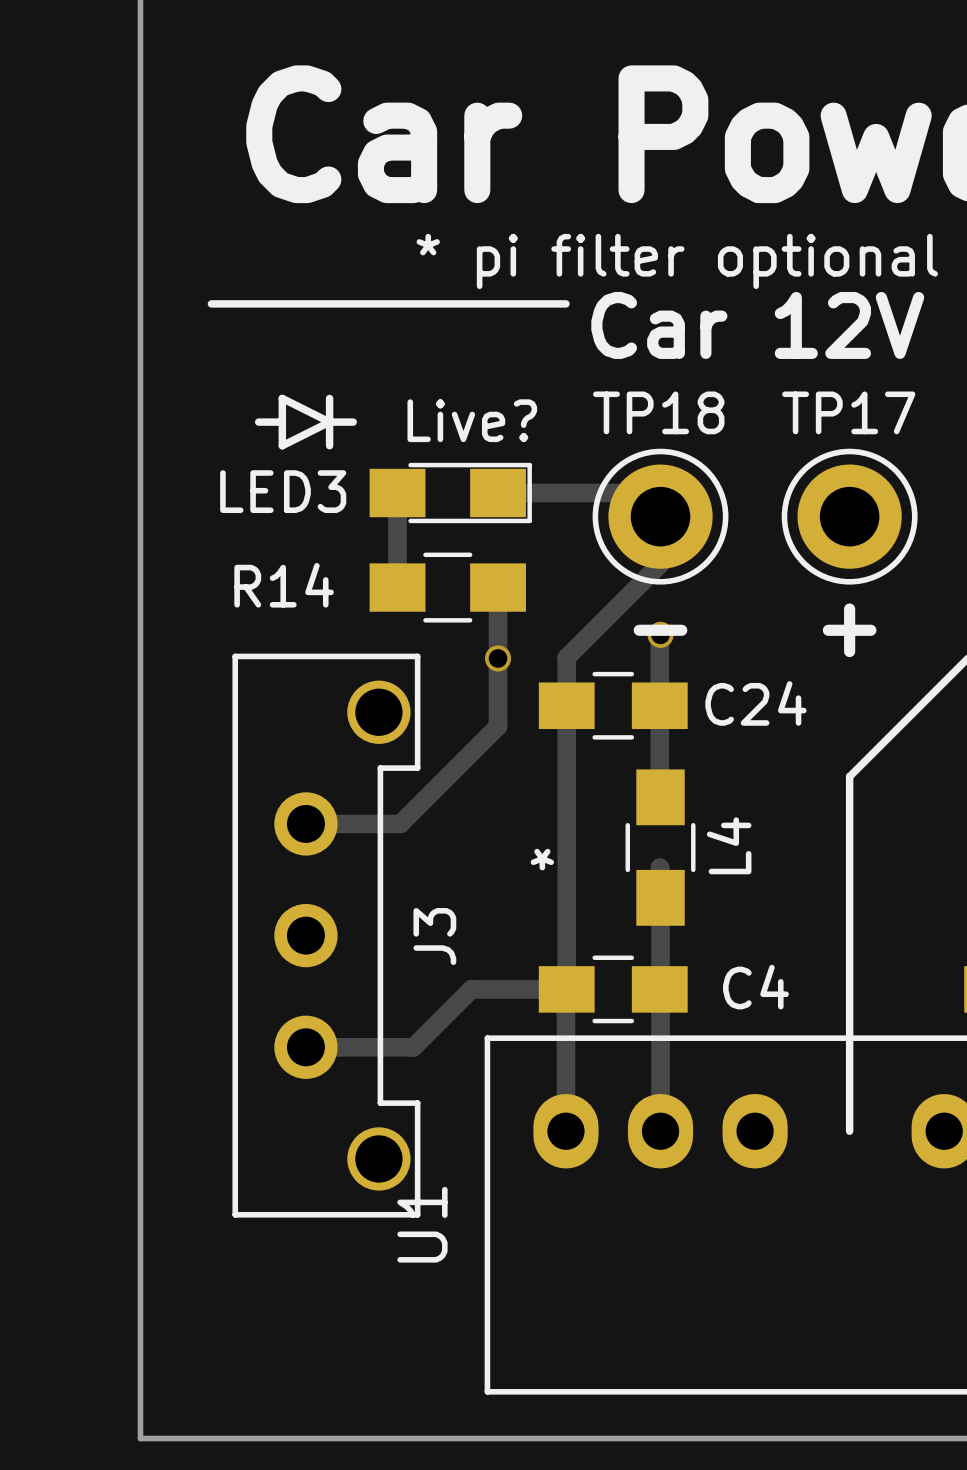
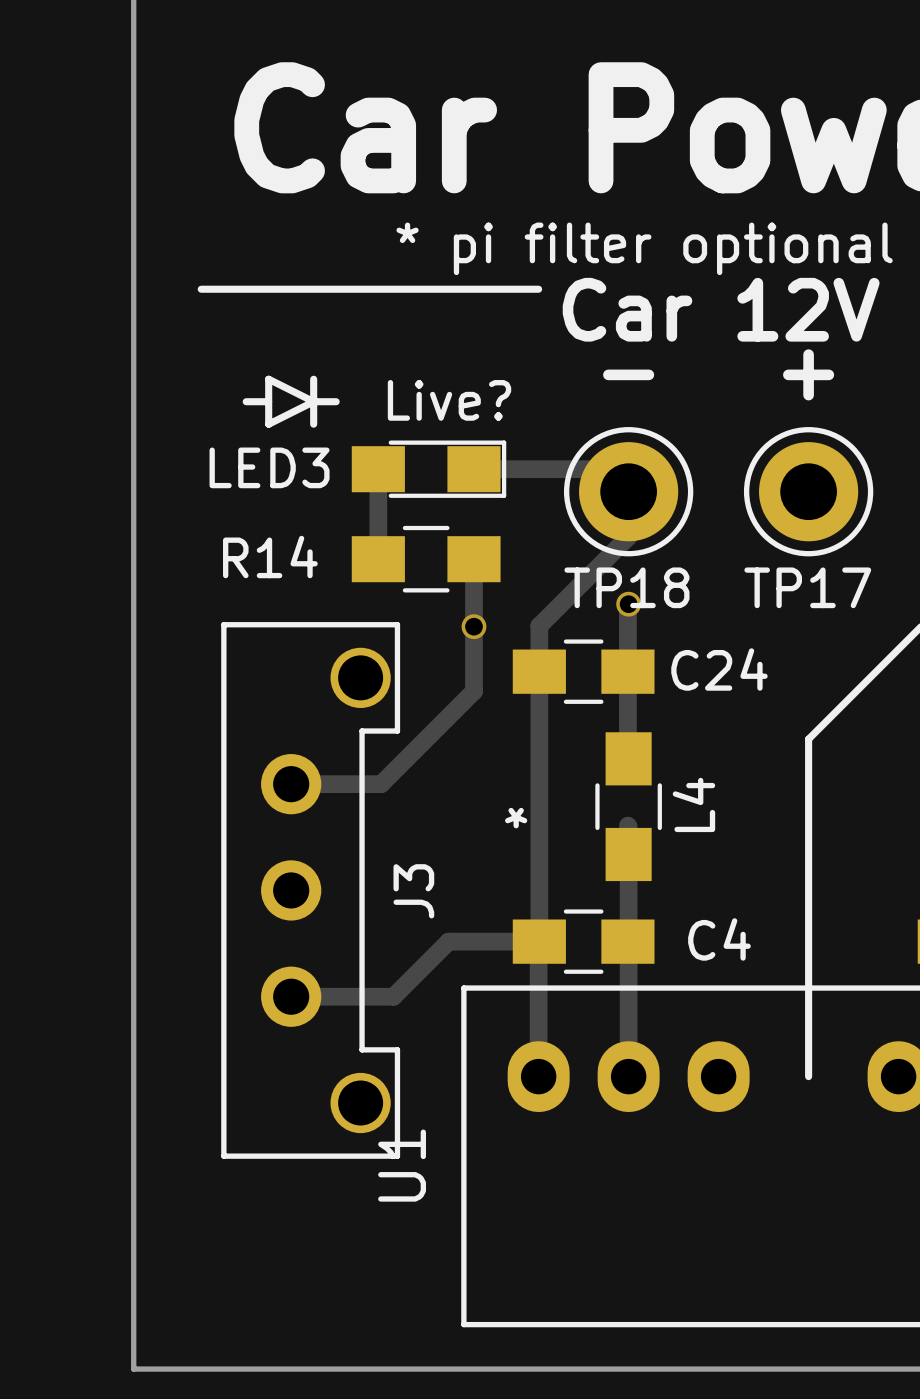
TP18 name position: TP18 (658, 412) -> TP18 (626, 587)
TP17 name position: TP17 (848, 412) -> TP17 (807, 587)
text position: - (660, 630) -> - (628, 374)
text position: + (849, 630) -> + (808, 374)

